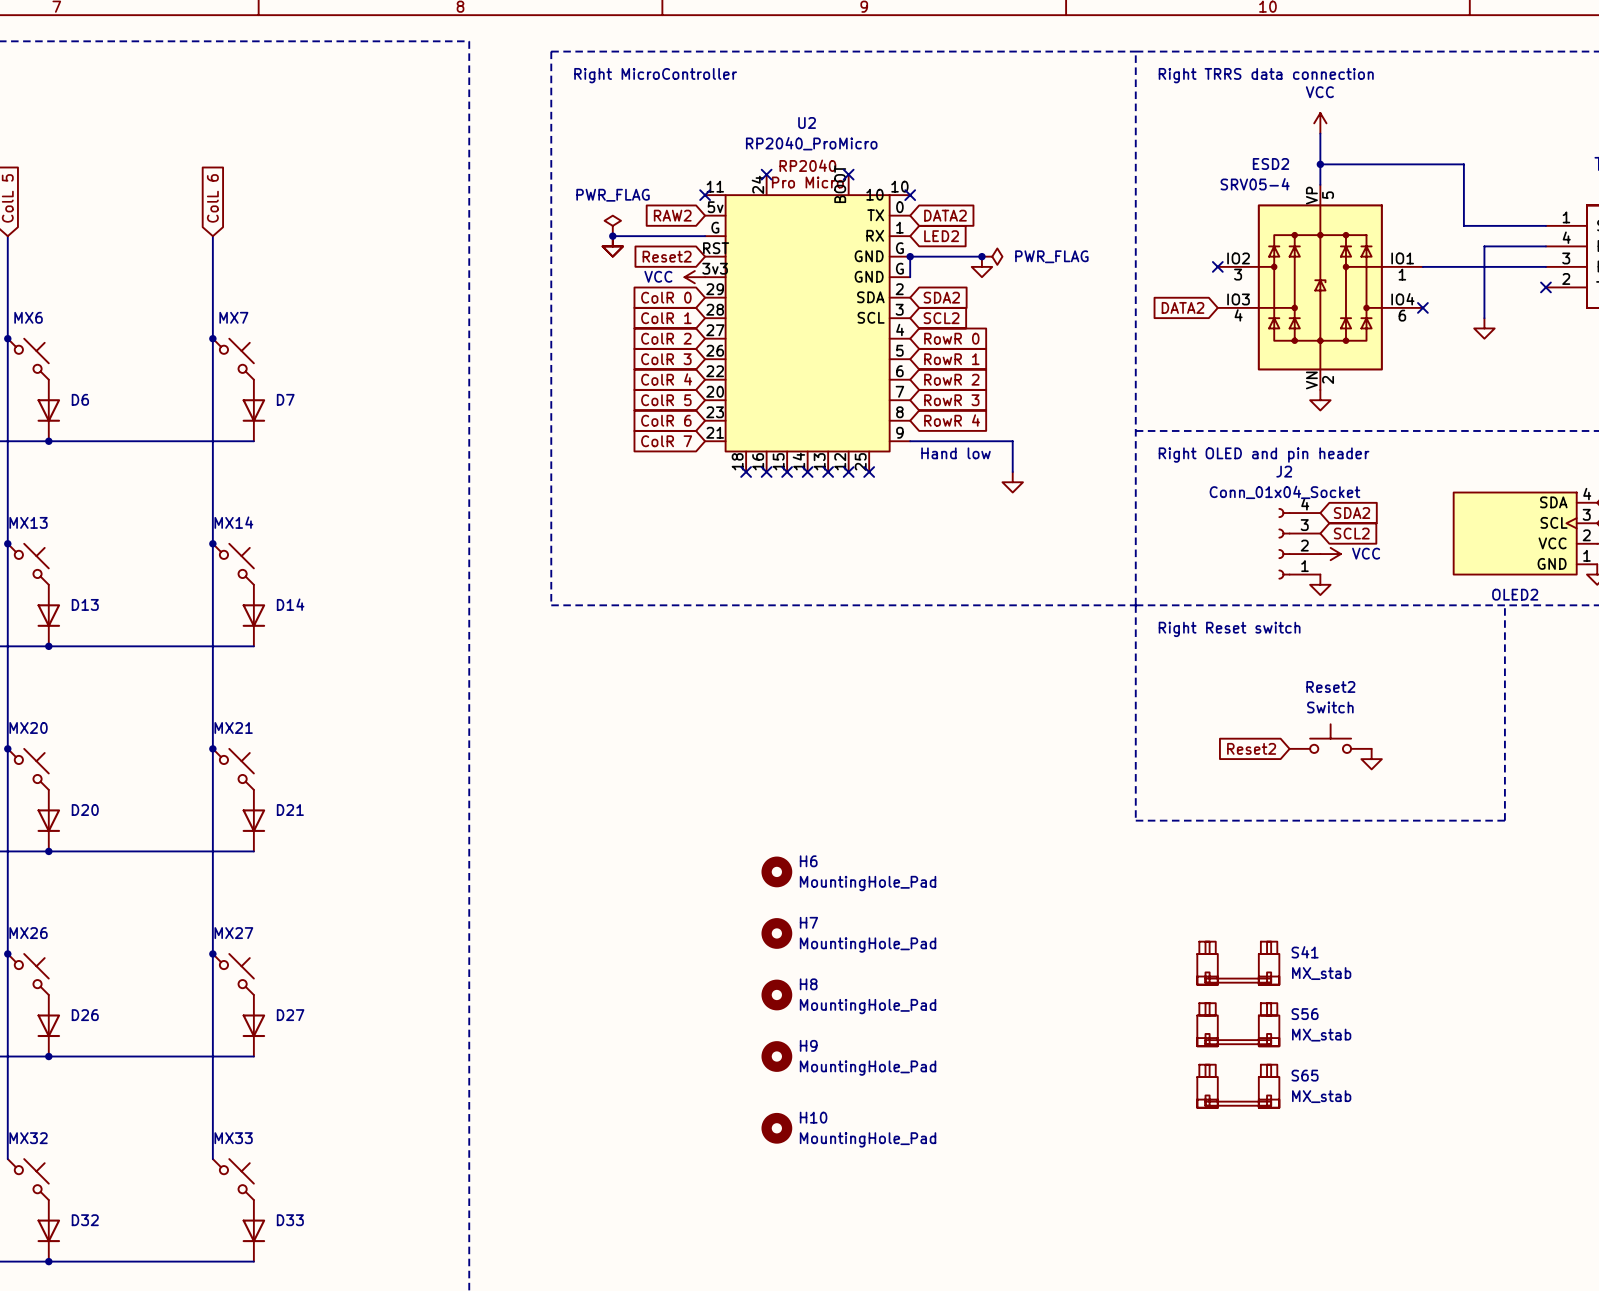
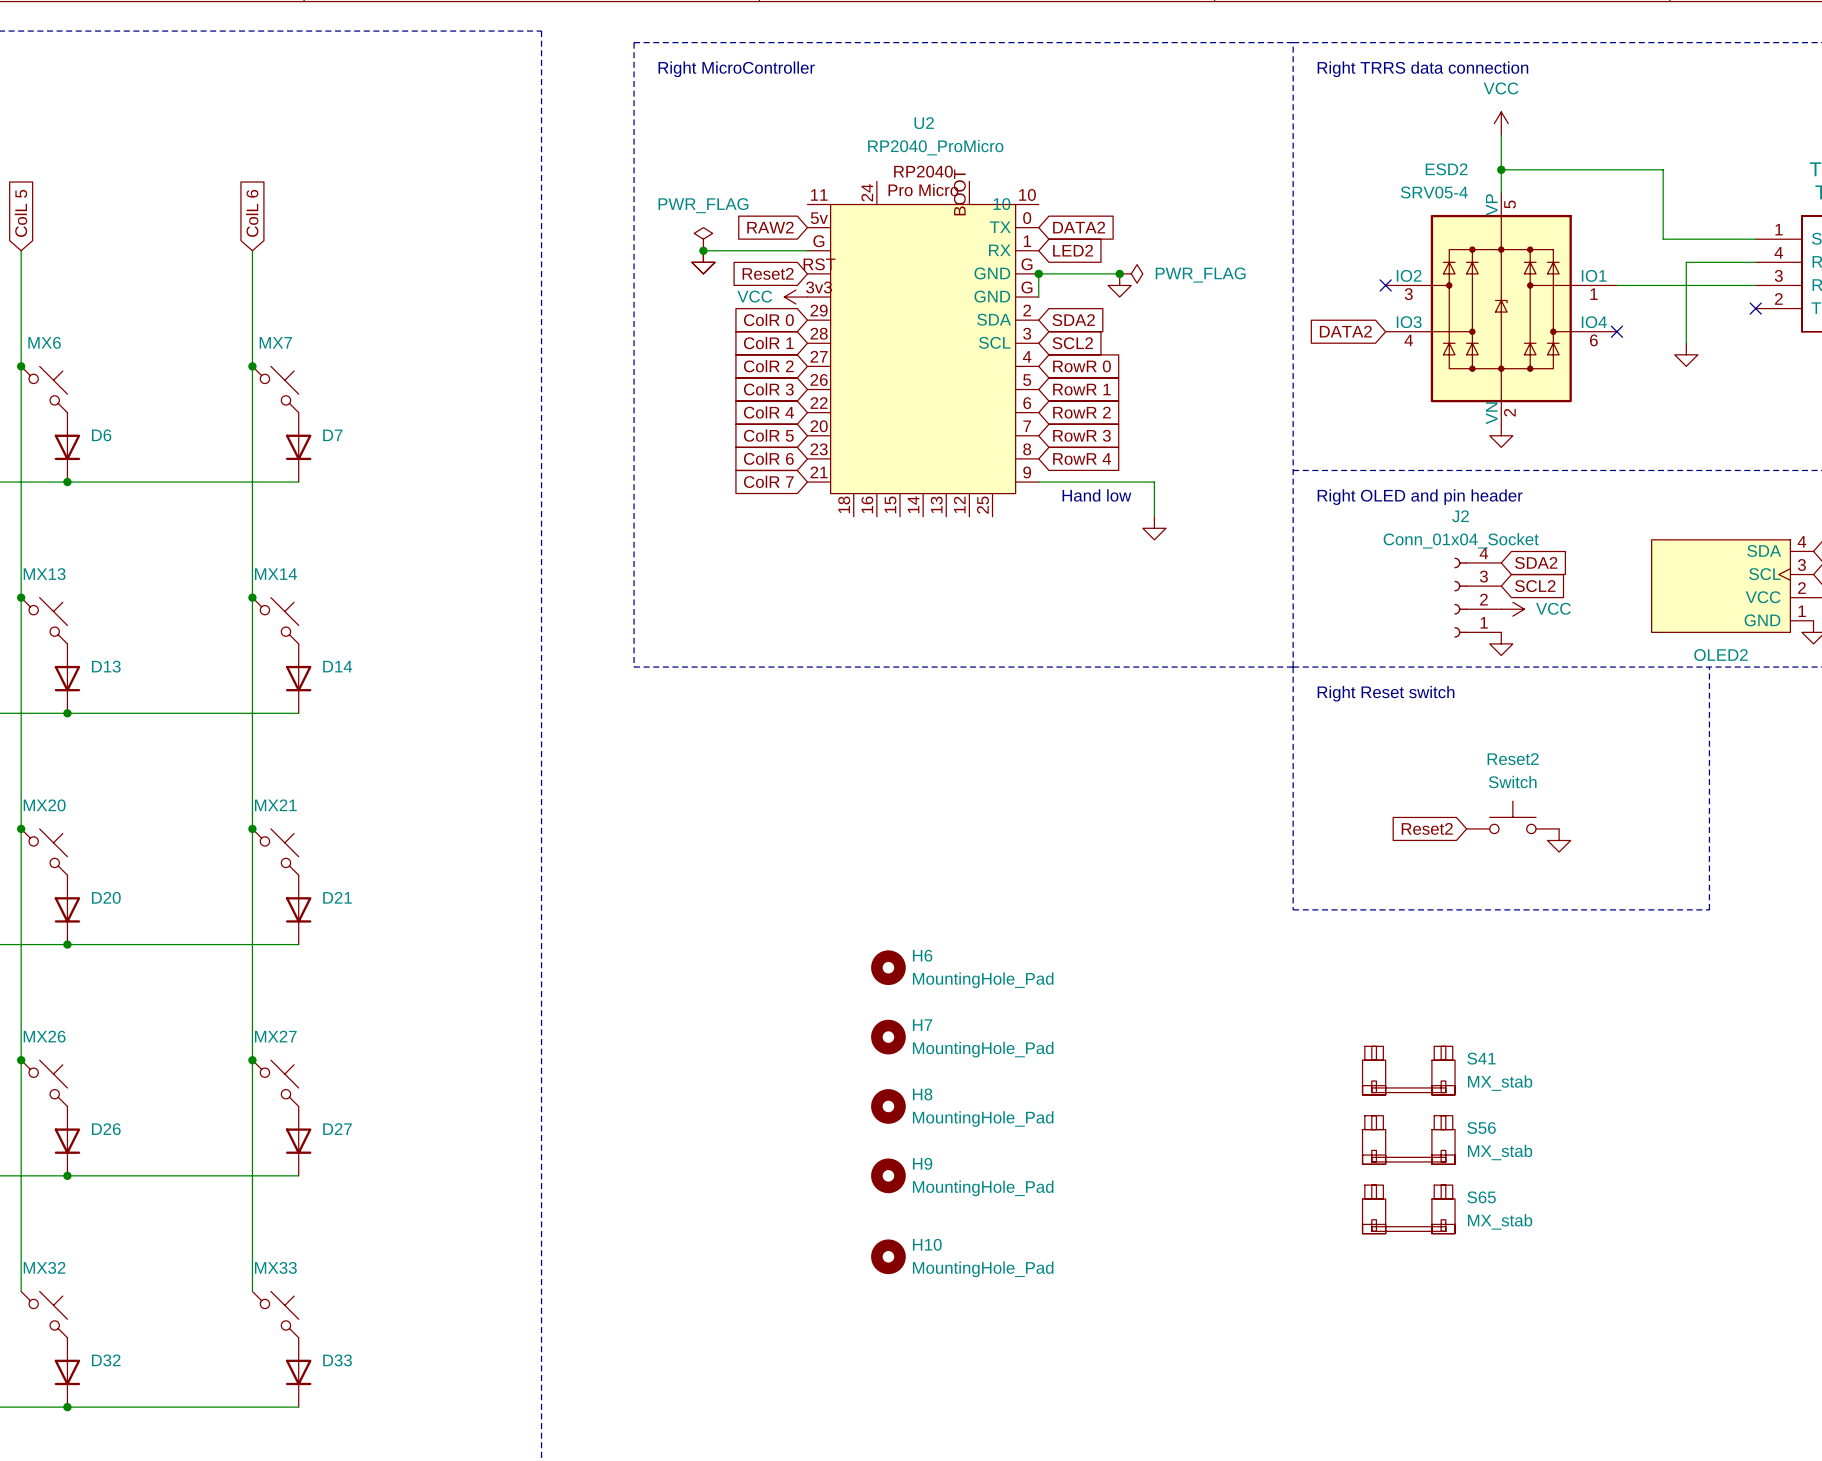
no-connect mark: (766, 174) -> none
no-connect mark: (848, 174) -> none
no-connect mark: (705, 195) -> none
no-connect mark: (910, 195) -> none
no-connect mark: (746, 472) -> none
no-connect mark: (766, 472) -> none
no-connect mark: (787, 472) -> none
no-connect mark: (807, 472) -> none
no-connect mark: (828, 472) -> none
no-connect mark: (848, 472) -> none
no-connect mark: (869, 472) -> none

